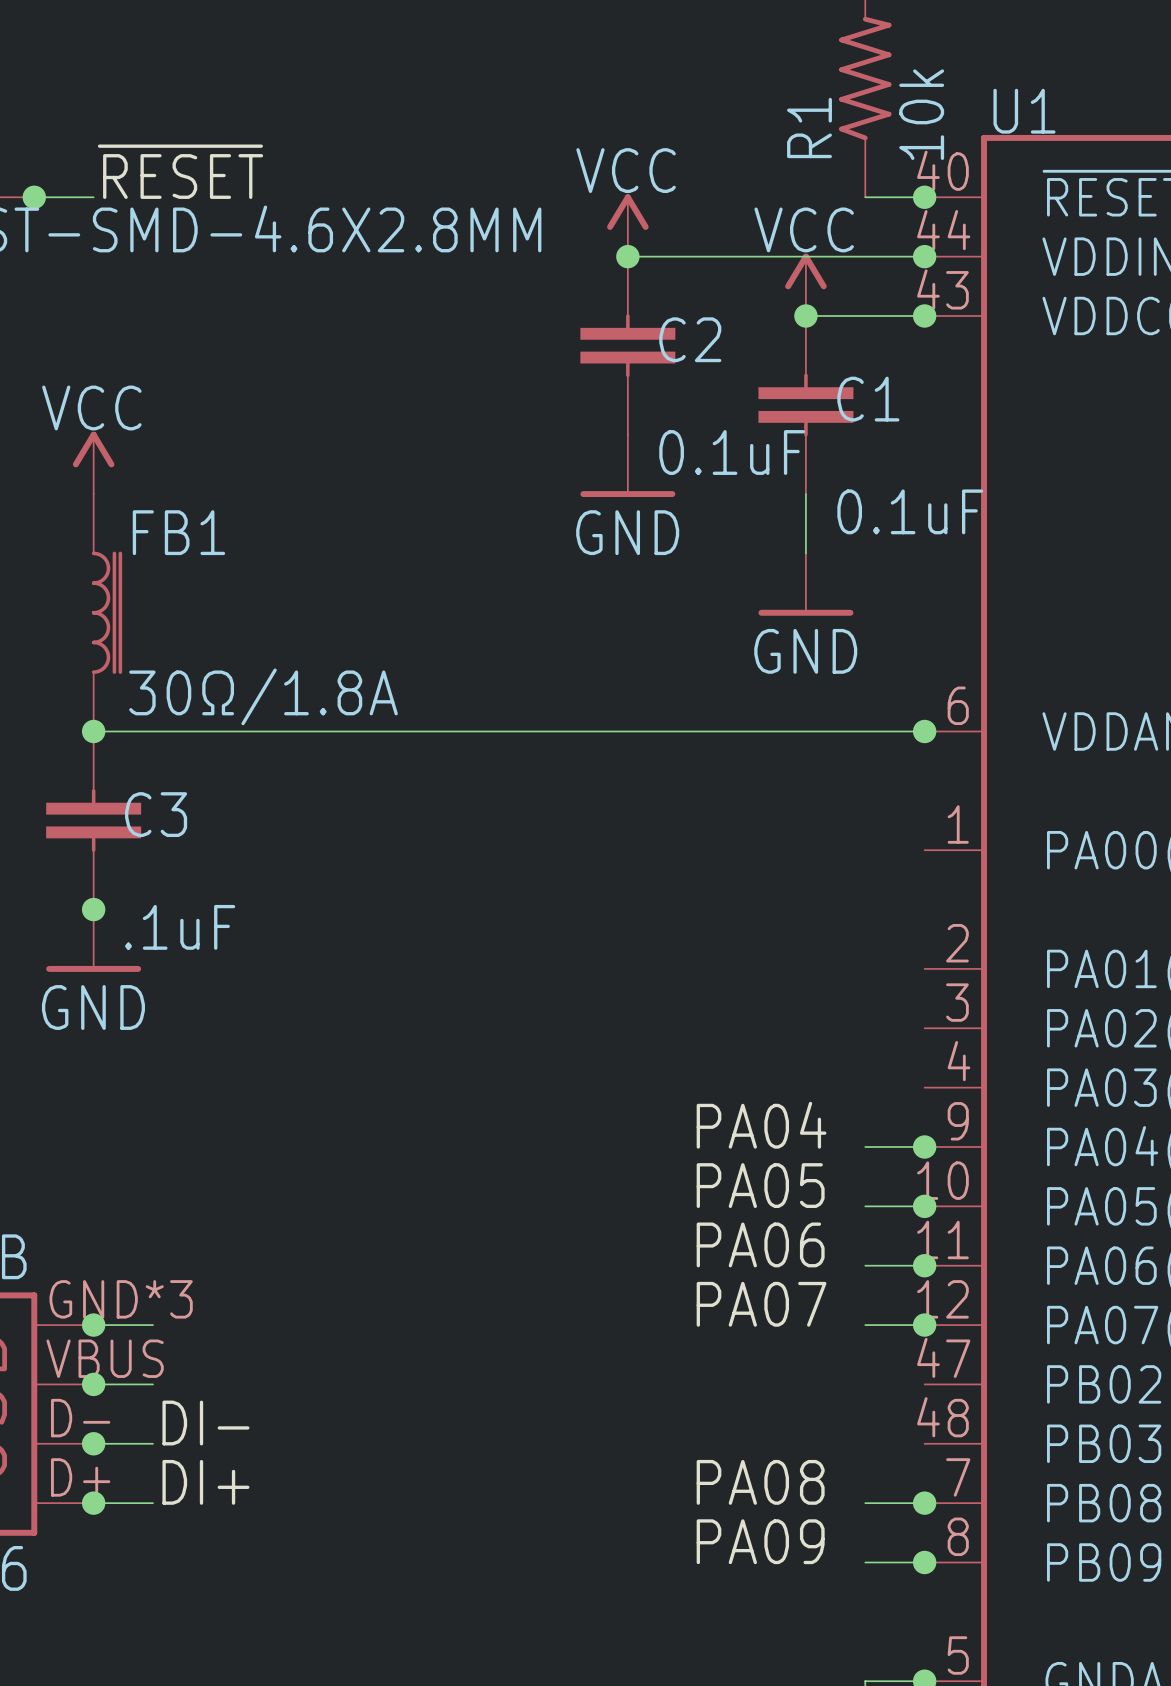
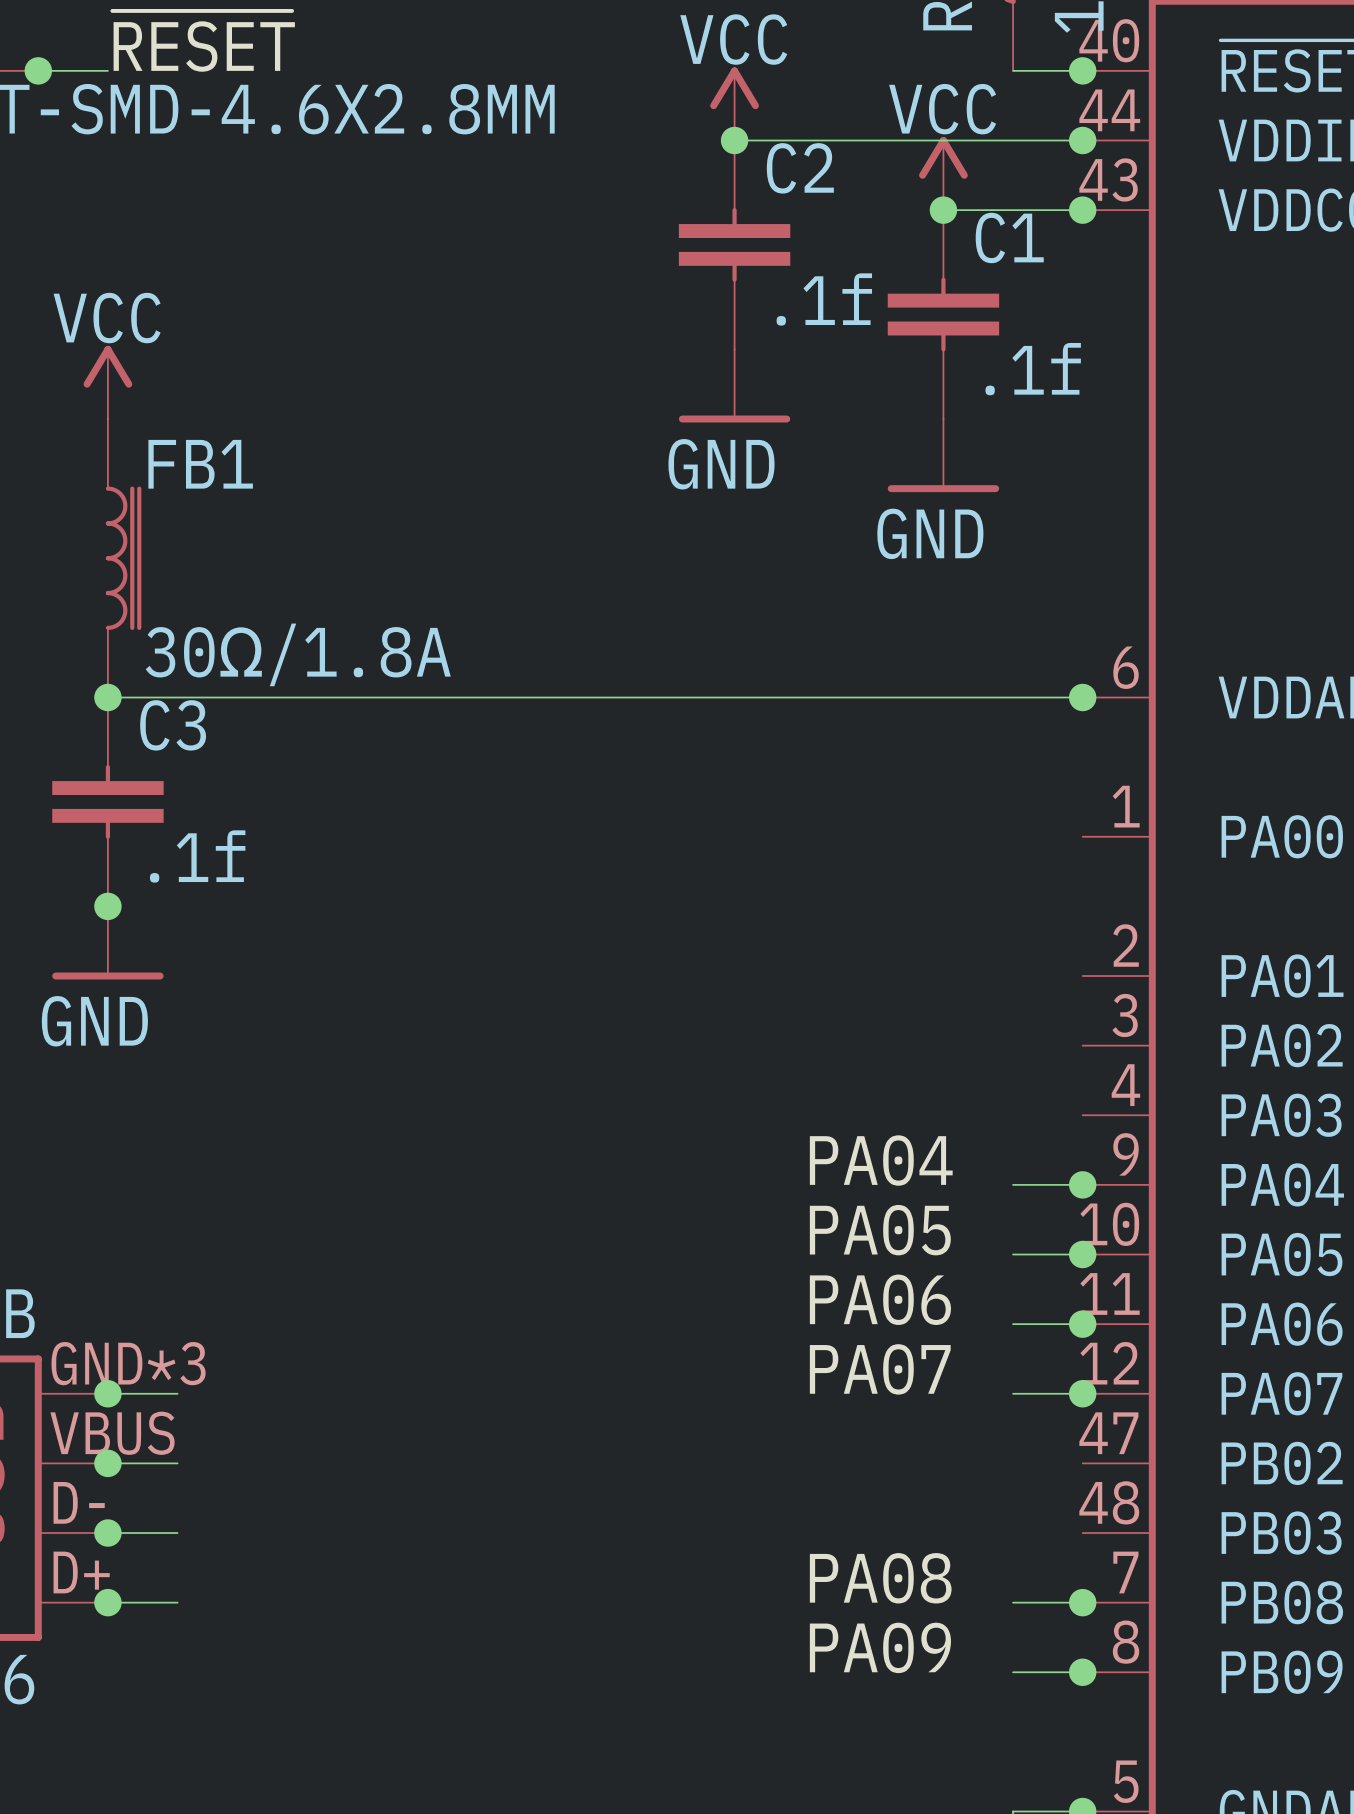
C2 name position: C2 (690, 339) -> C2 (800, 168)
C1 name position: C1 (868, 399) -> C1 (1009, 237)
C2 value: 0.1uF (732, 452) -> .1f (824, 299)
C1 value: 0.1uF (910, 511) -> .1f (1033, 369)
power symbol position: GND (805, 584) -> GND (943, 455)
C3 name position: C3 (156, 814) -> C3 (173, 725)
C3 value: .1uF (180, 927) -> .1f (197, 856)
label: DI- (205, 1423) -> none
label: DI+ (205, 1482) -> none

